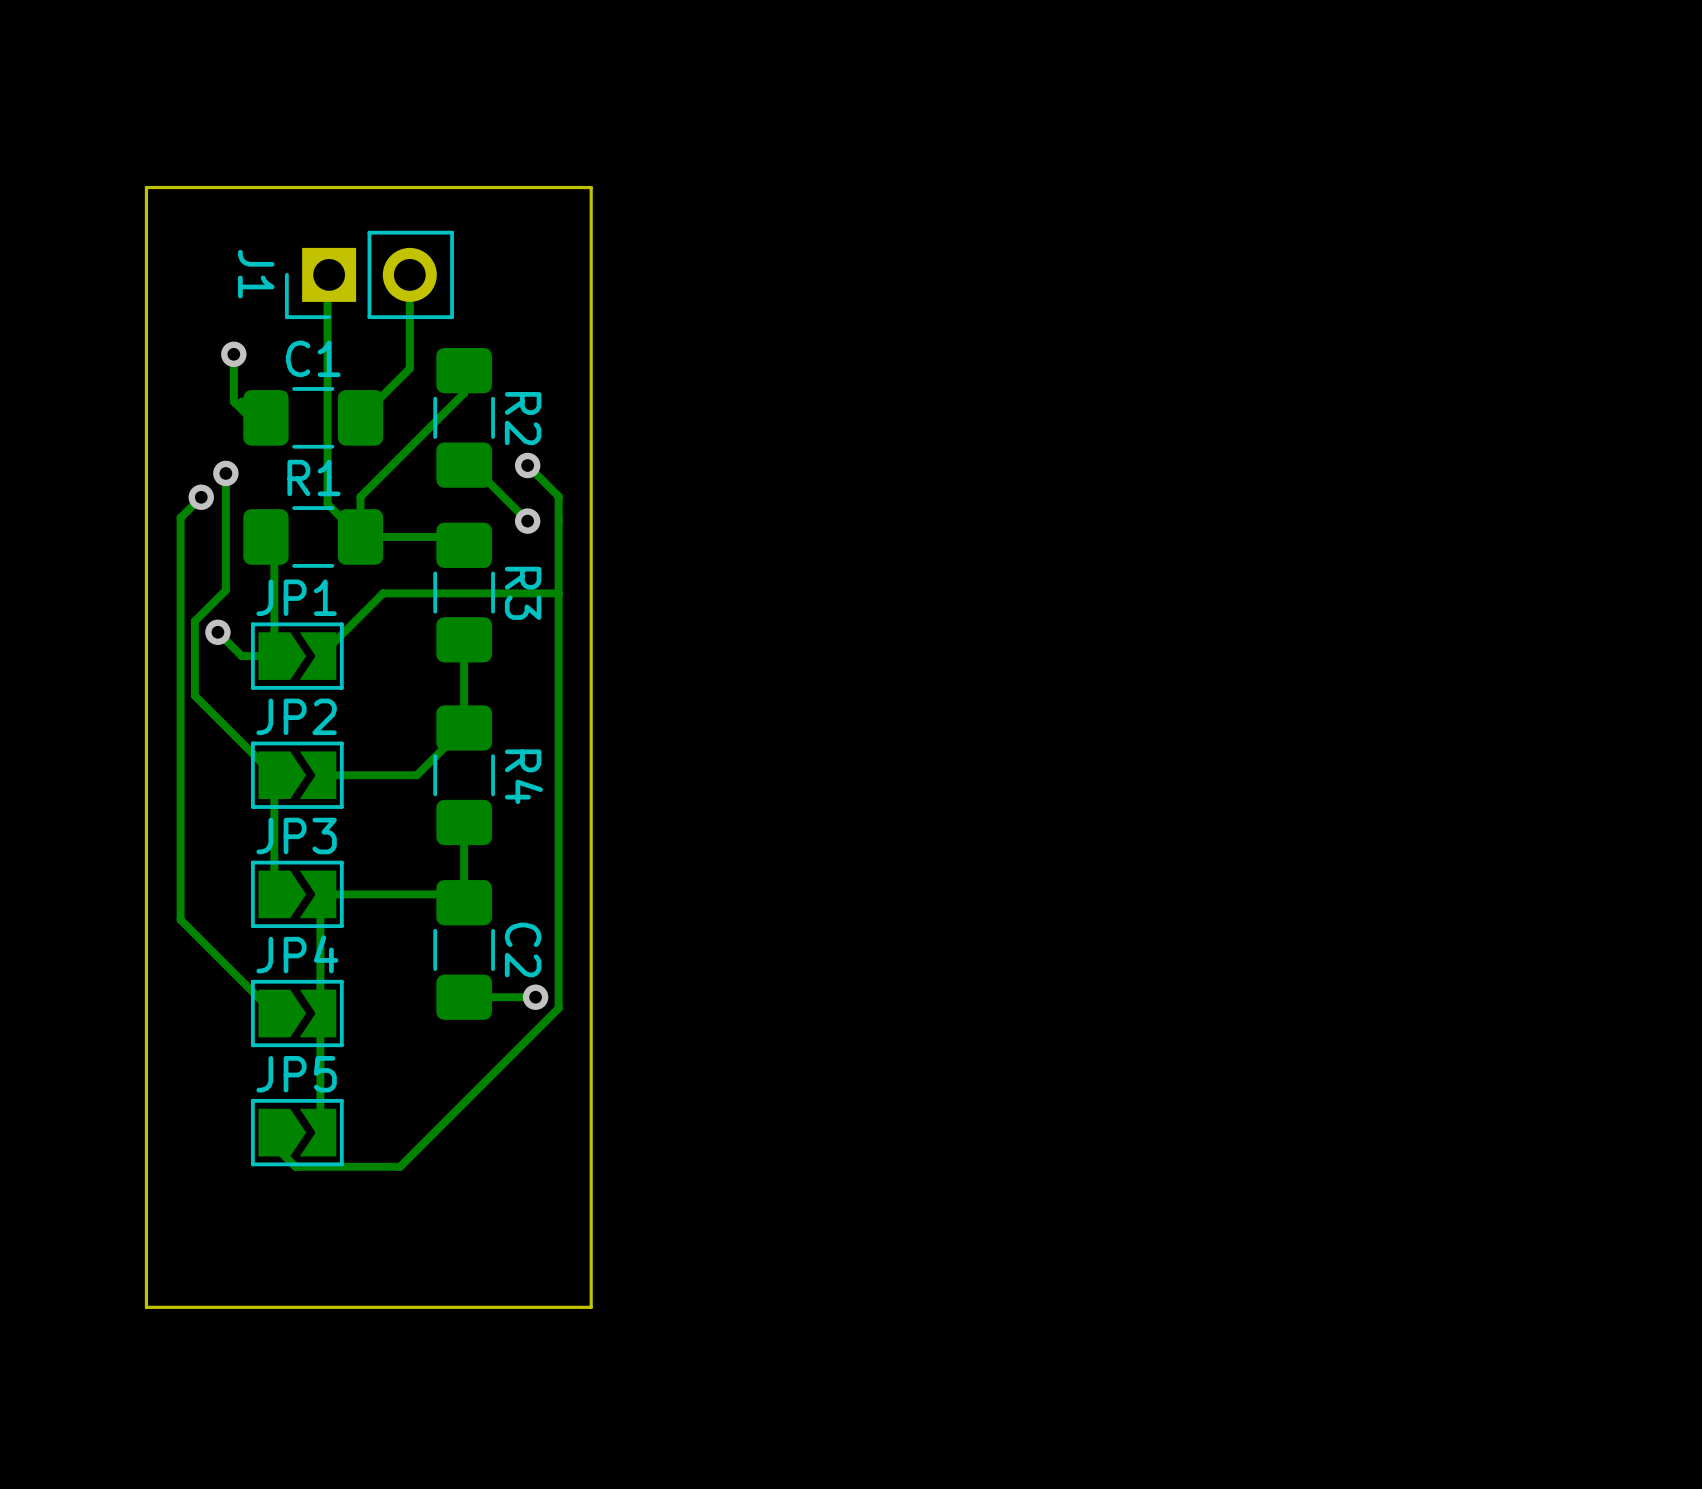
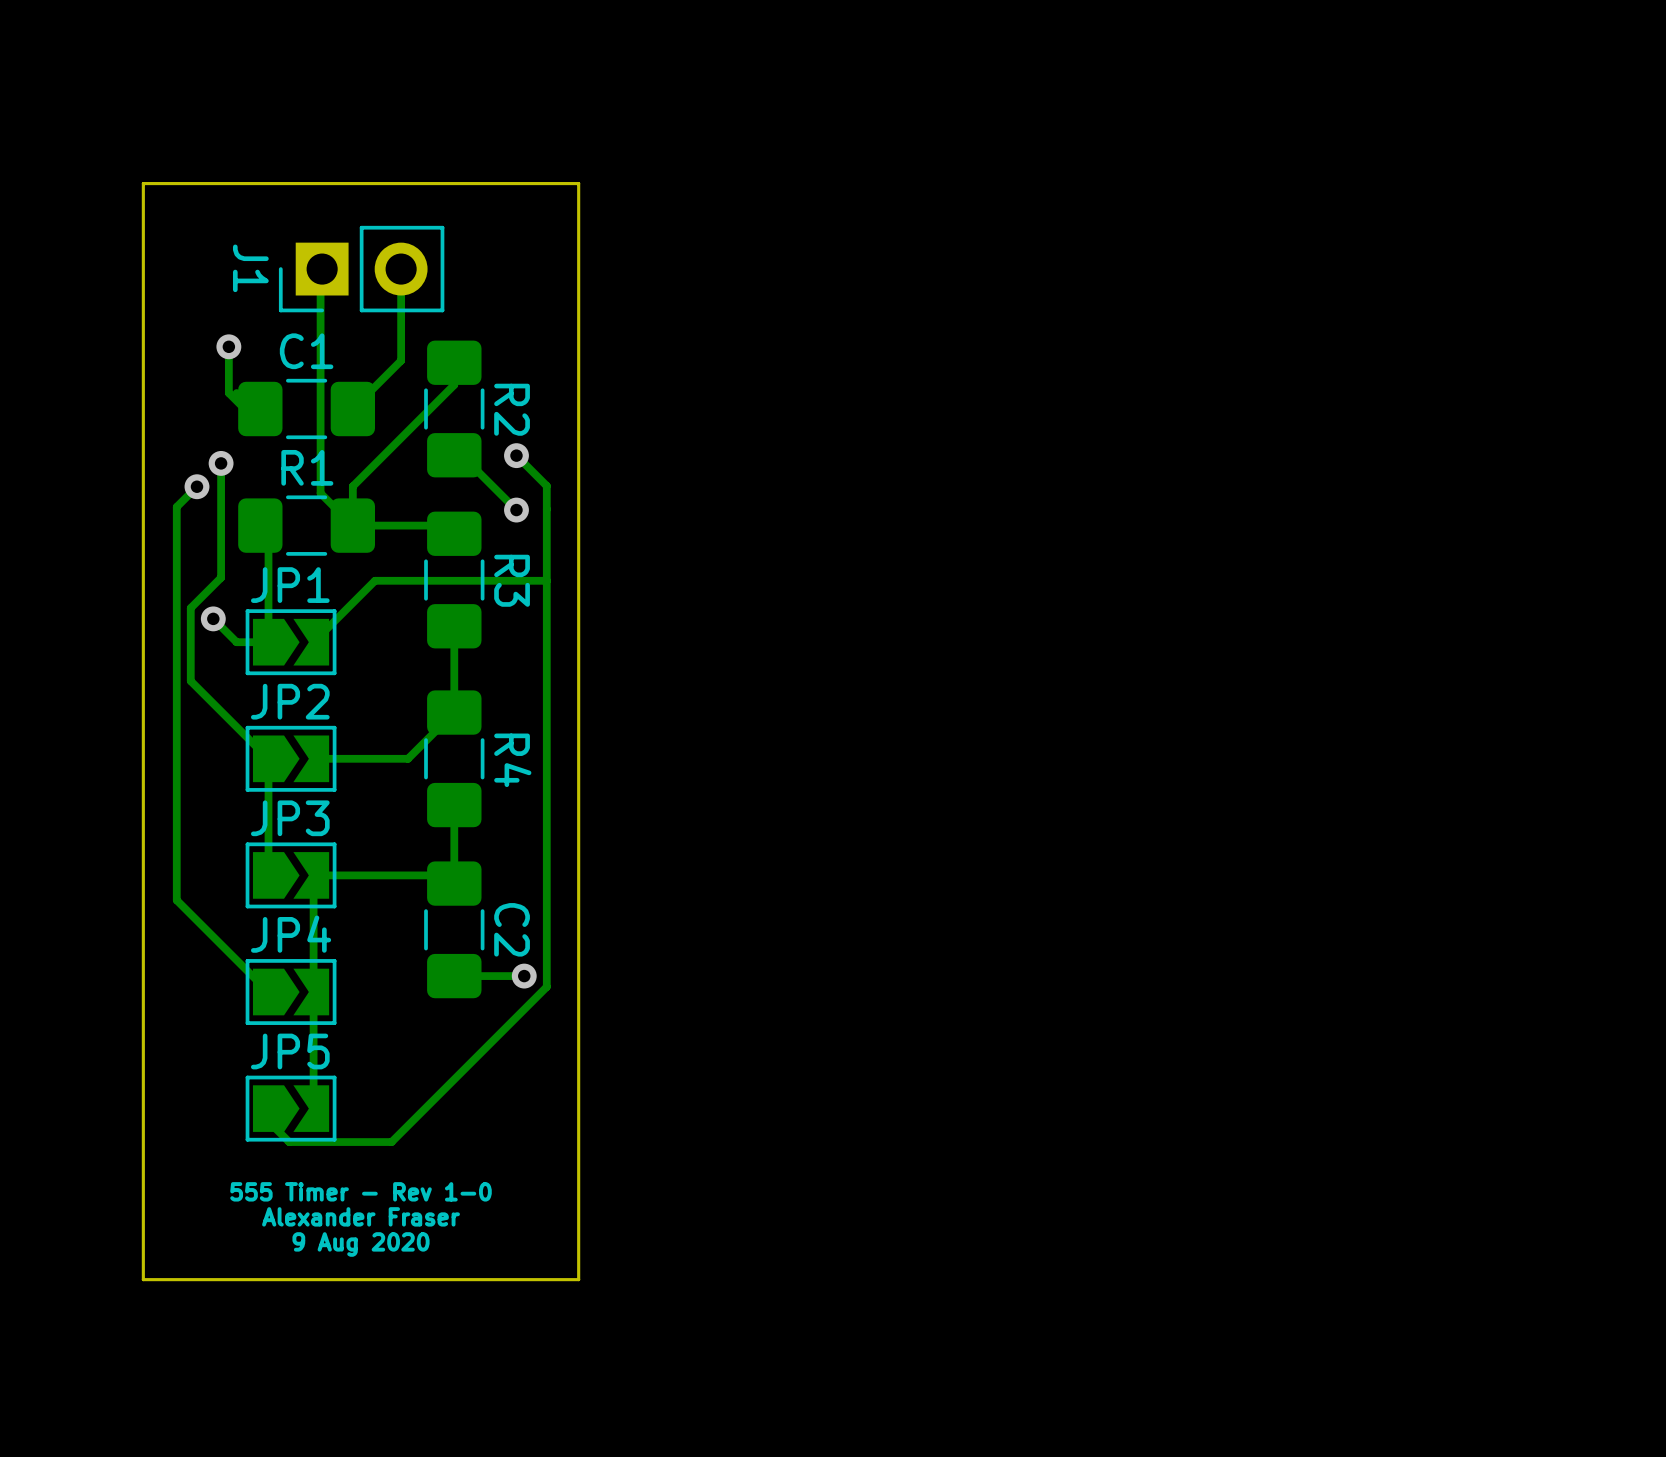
text: none -> 555 Timer - Rev 1-0 (361, 1191)
text: none -> Alexander Fraser (361, 1216)
text: none -> 9 Aug 2020 (361, 1244)

